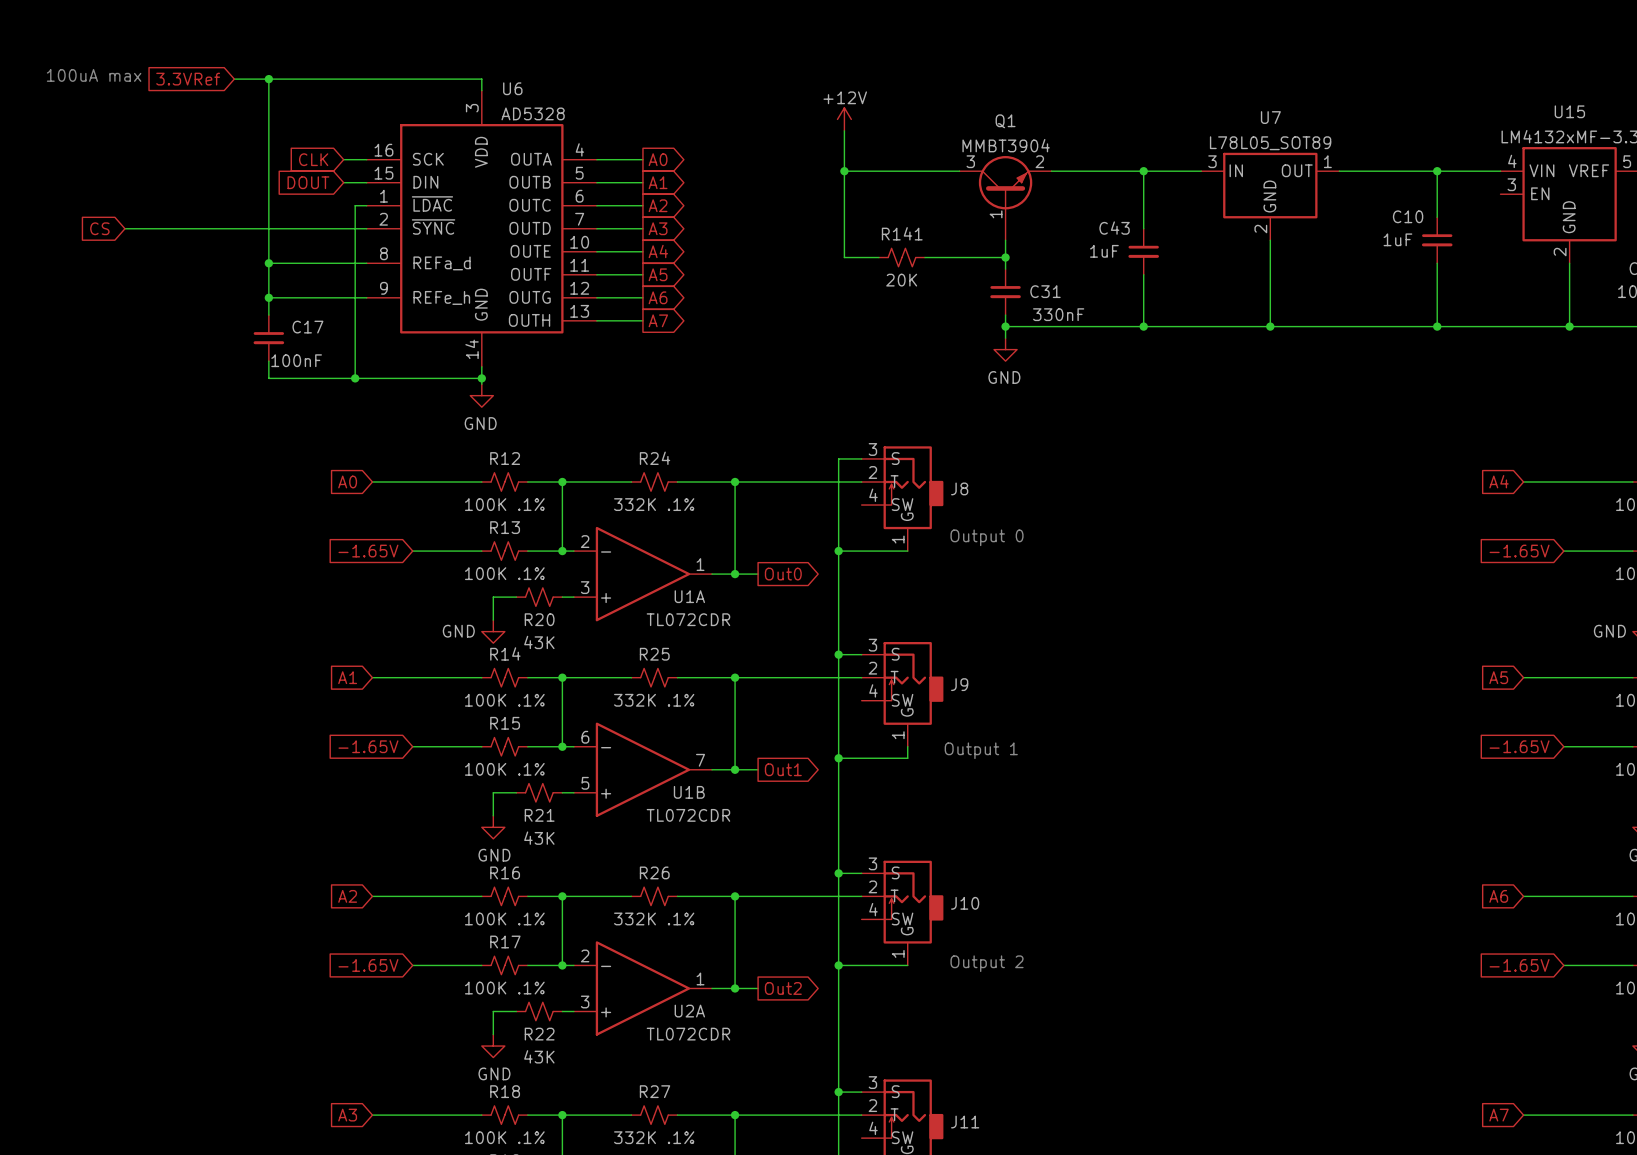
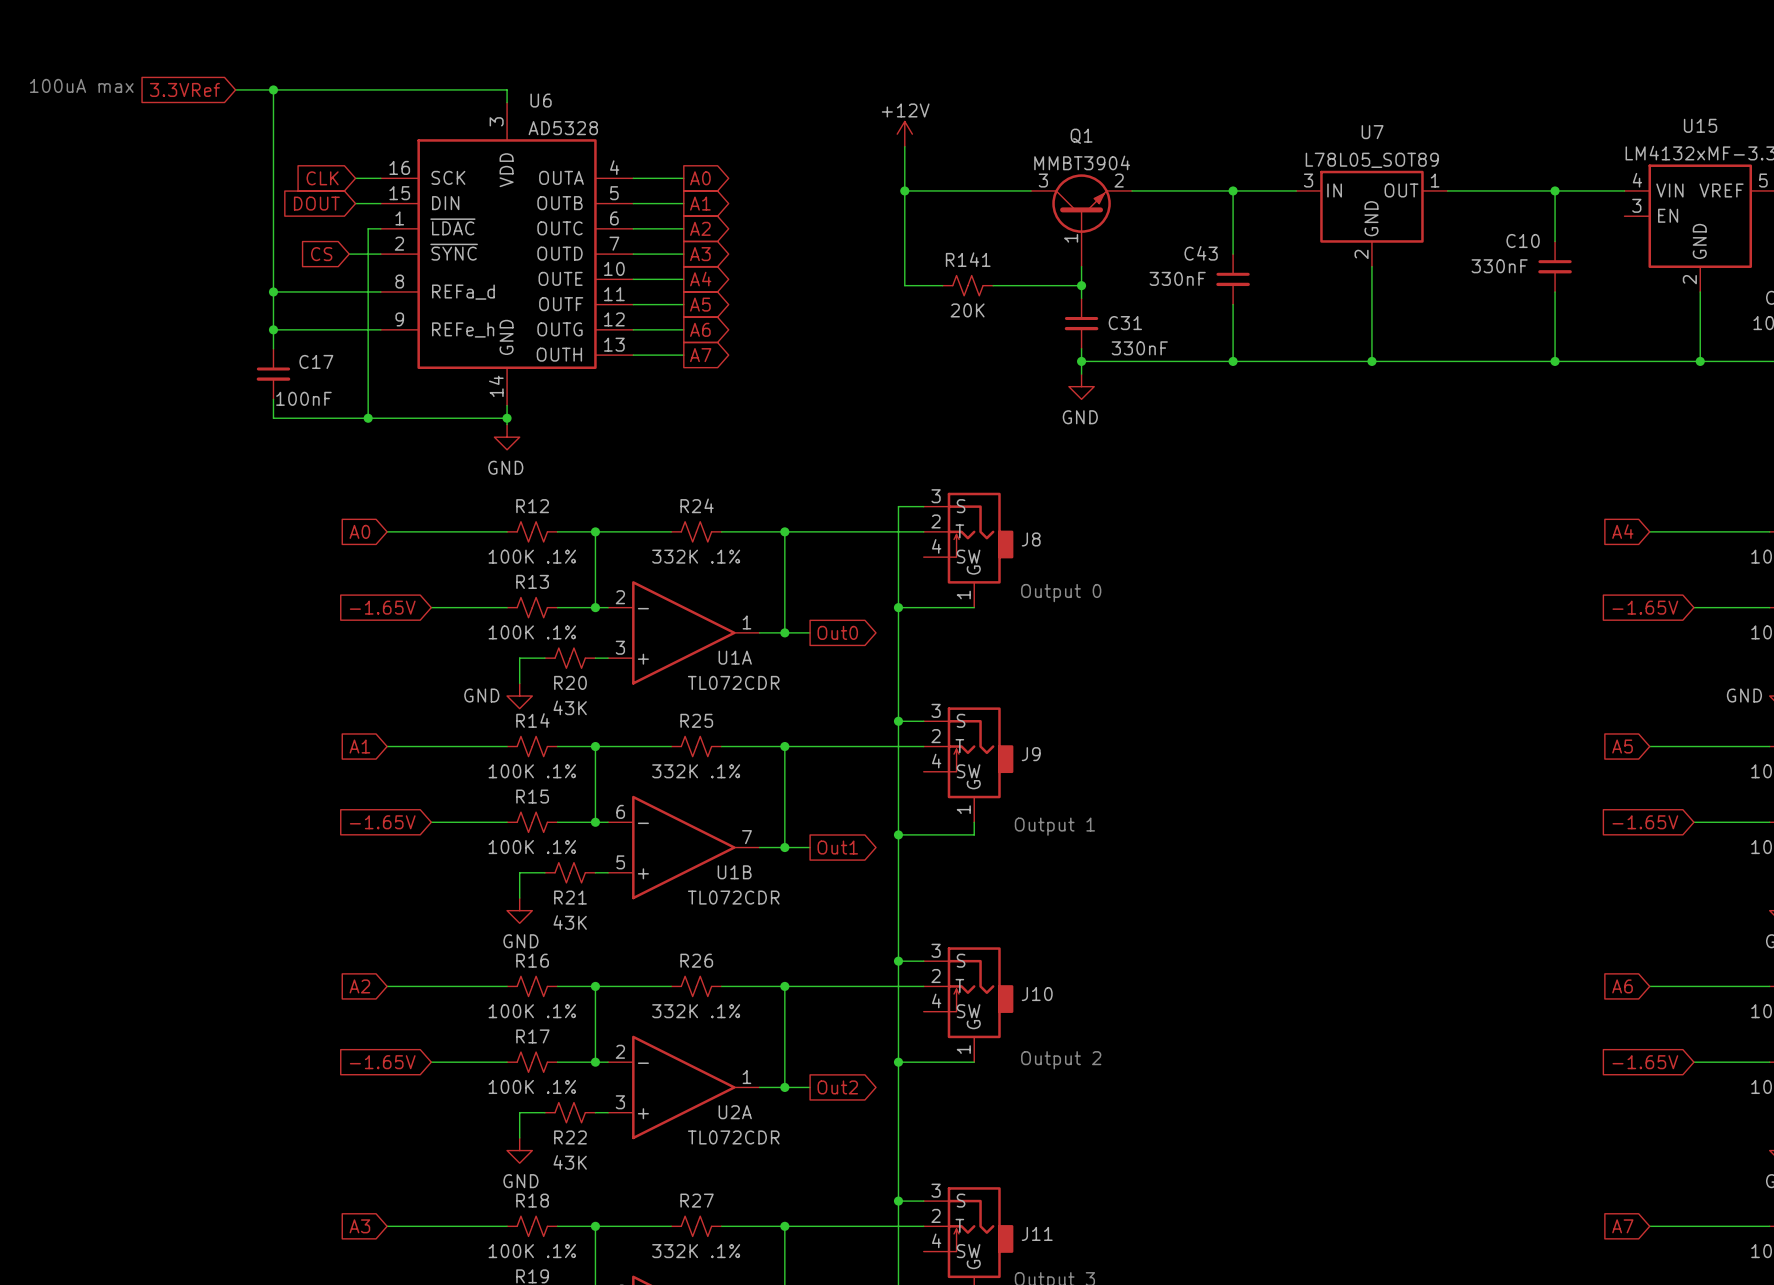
global label position: CS (99, 228) -> CS (321, 254)
wire: (124, 228) (337, 228) -> none
C10 value: 1uF (1397, 239) -> 330nF (1499, 266)
C43 value: 1uF (1104, 251) -> 330nF (1177, 278)

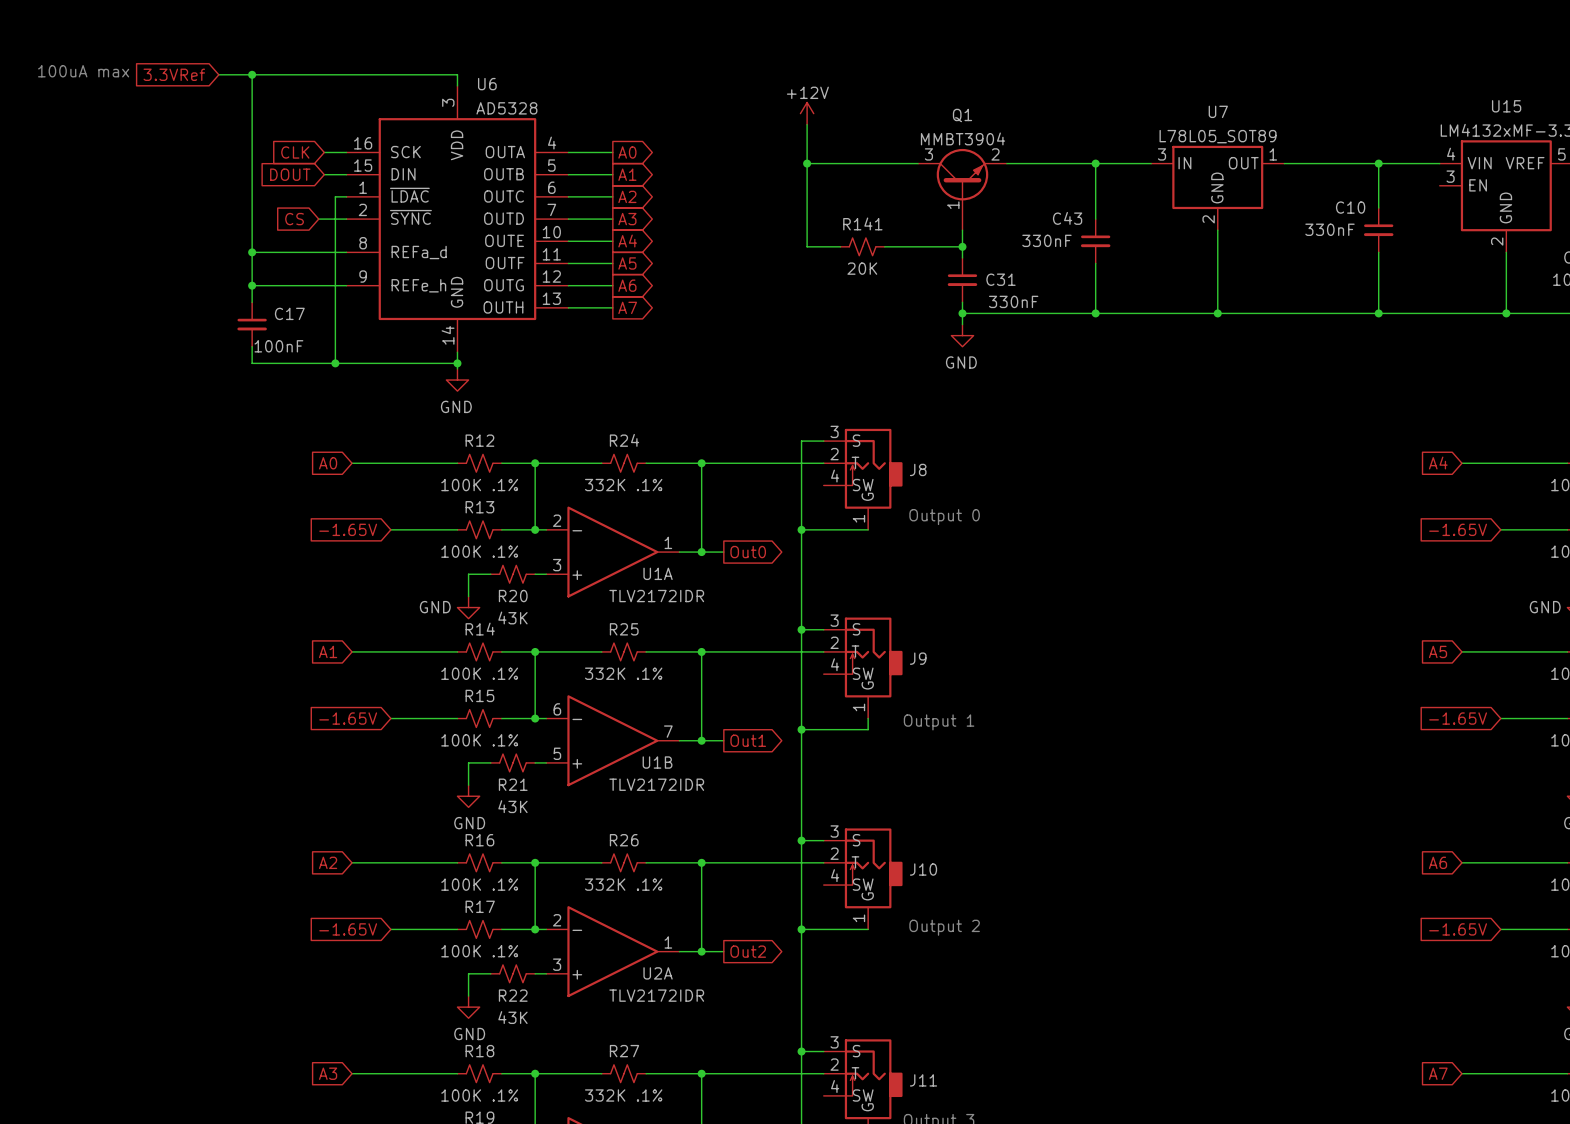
U1A value: TL072CDR (733, 682) -> TLV2172IDR (656, 596)
U1B value: TL072CDR (733, 897) -> TLV2172IDR (656, 784)
U2A value: TL072CDR (733, 1137) -> TLV2172IDR (656, 995)

